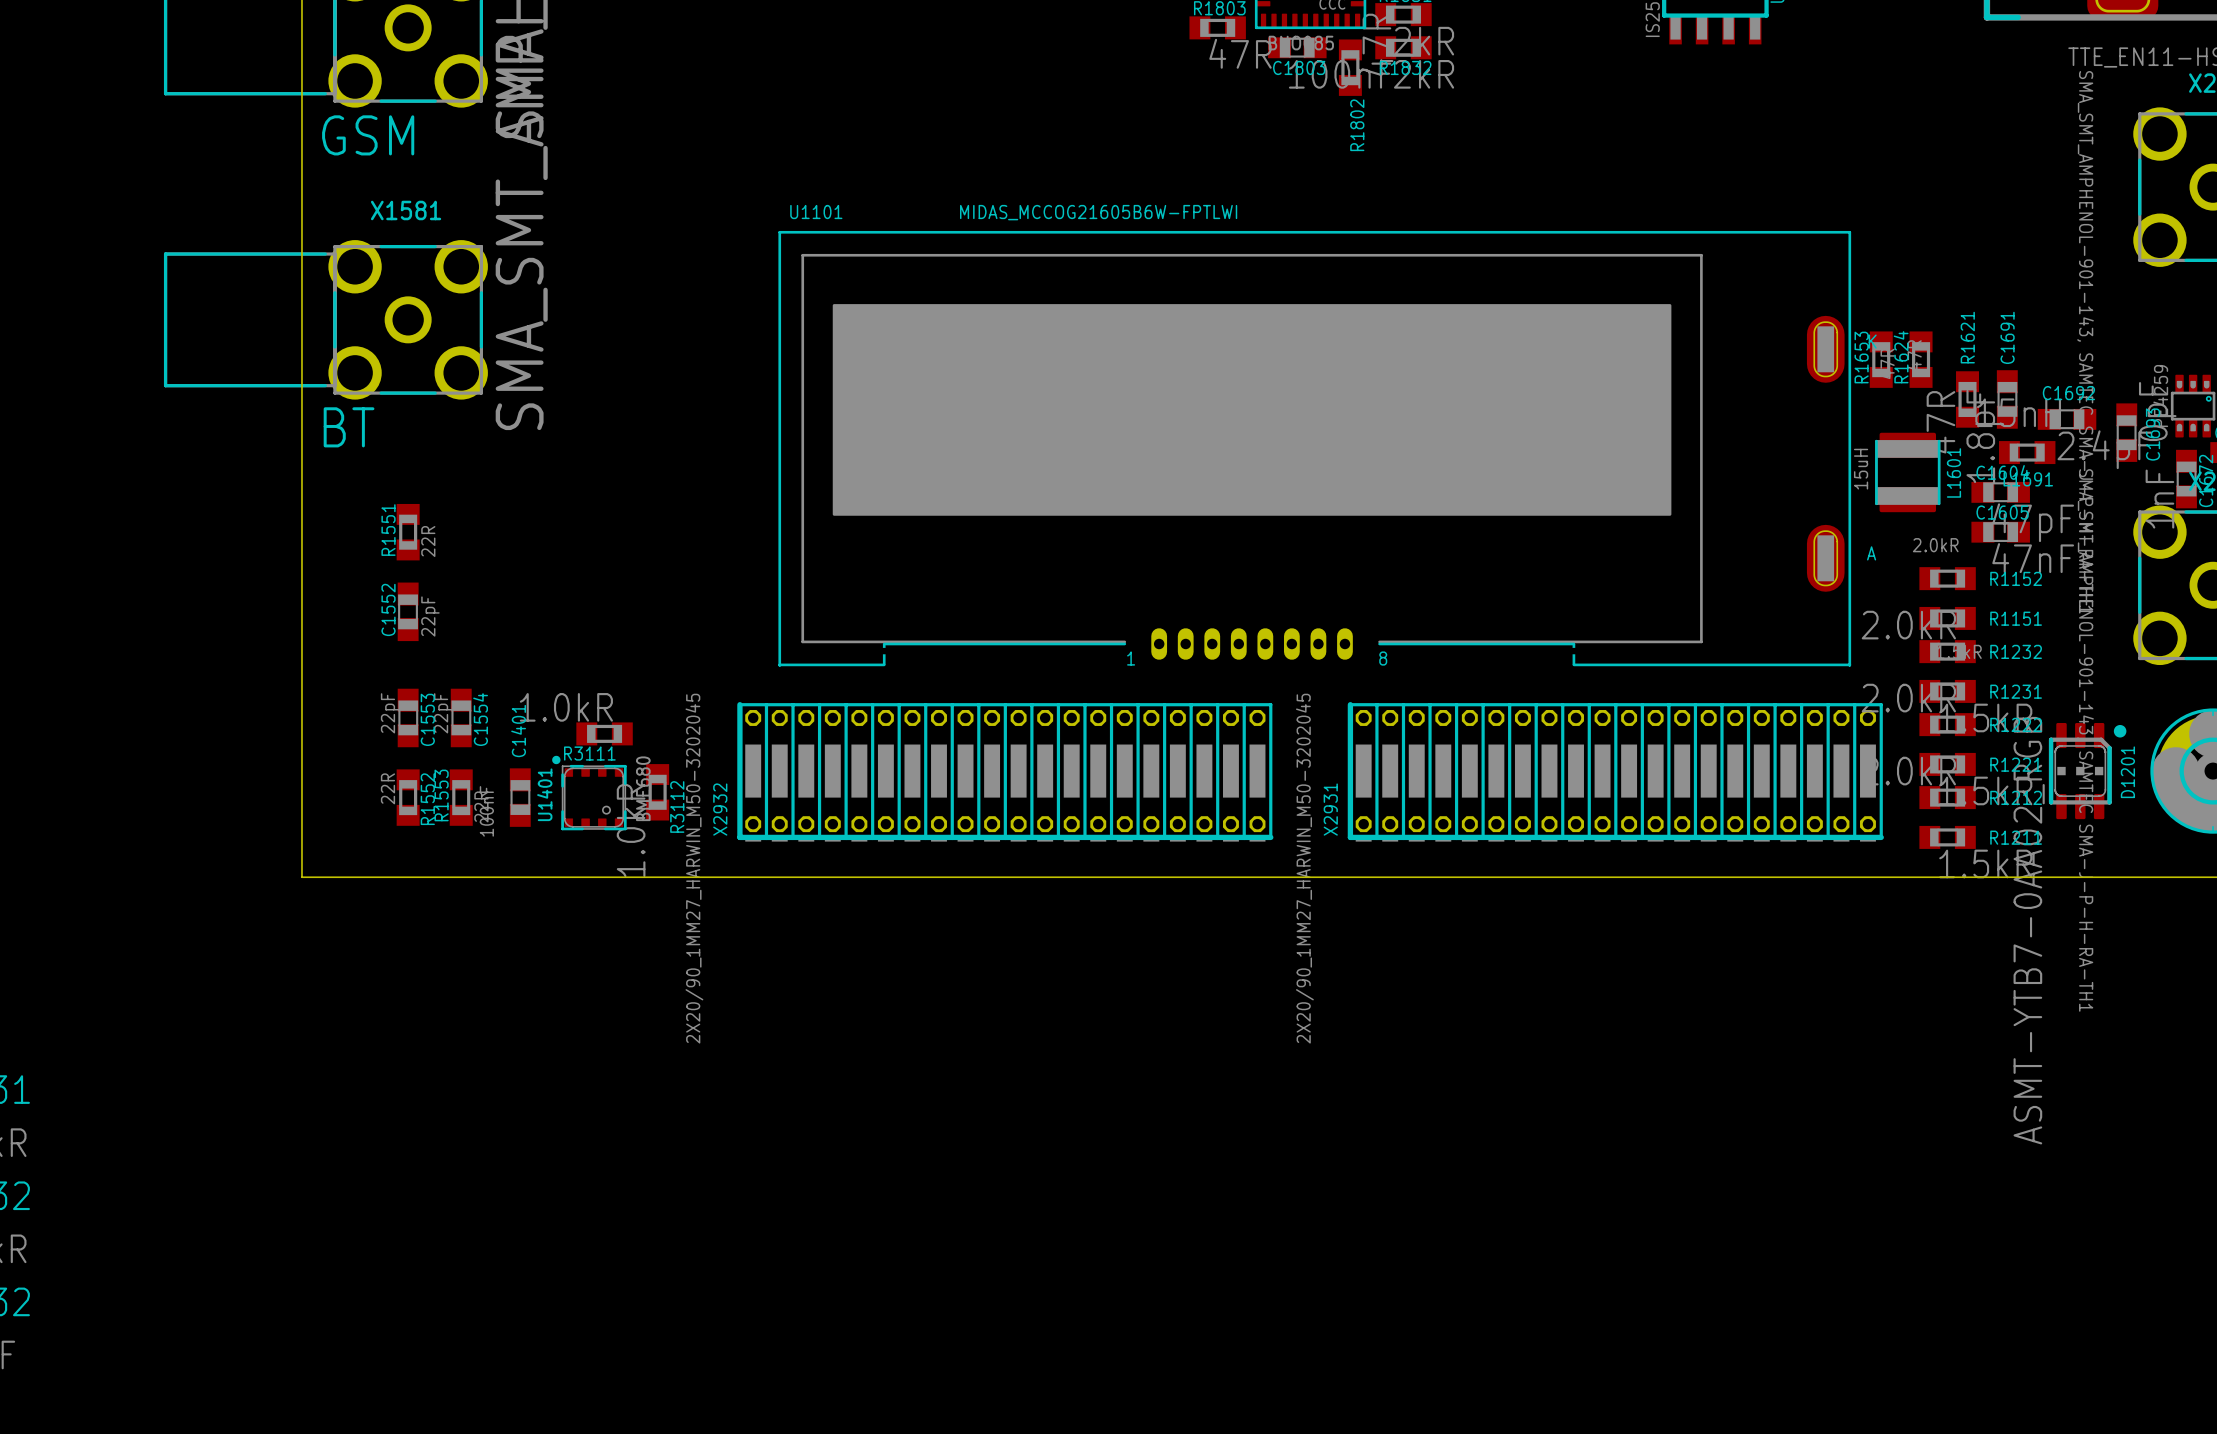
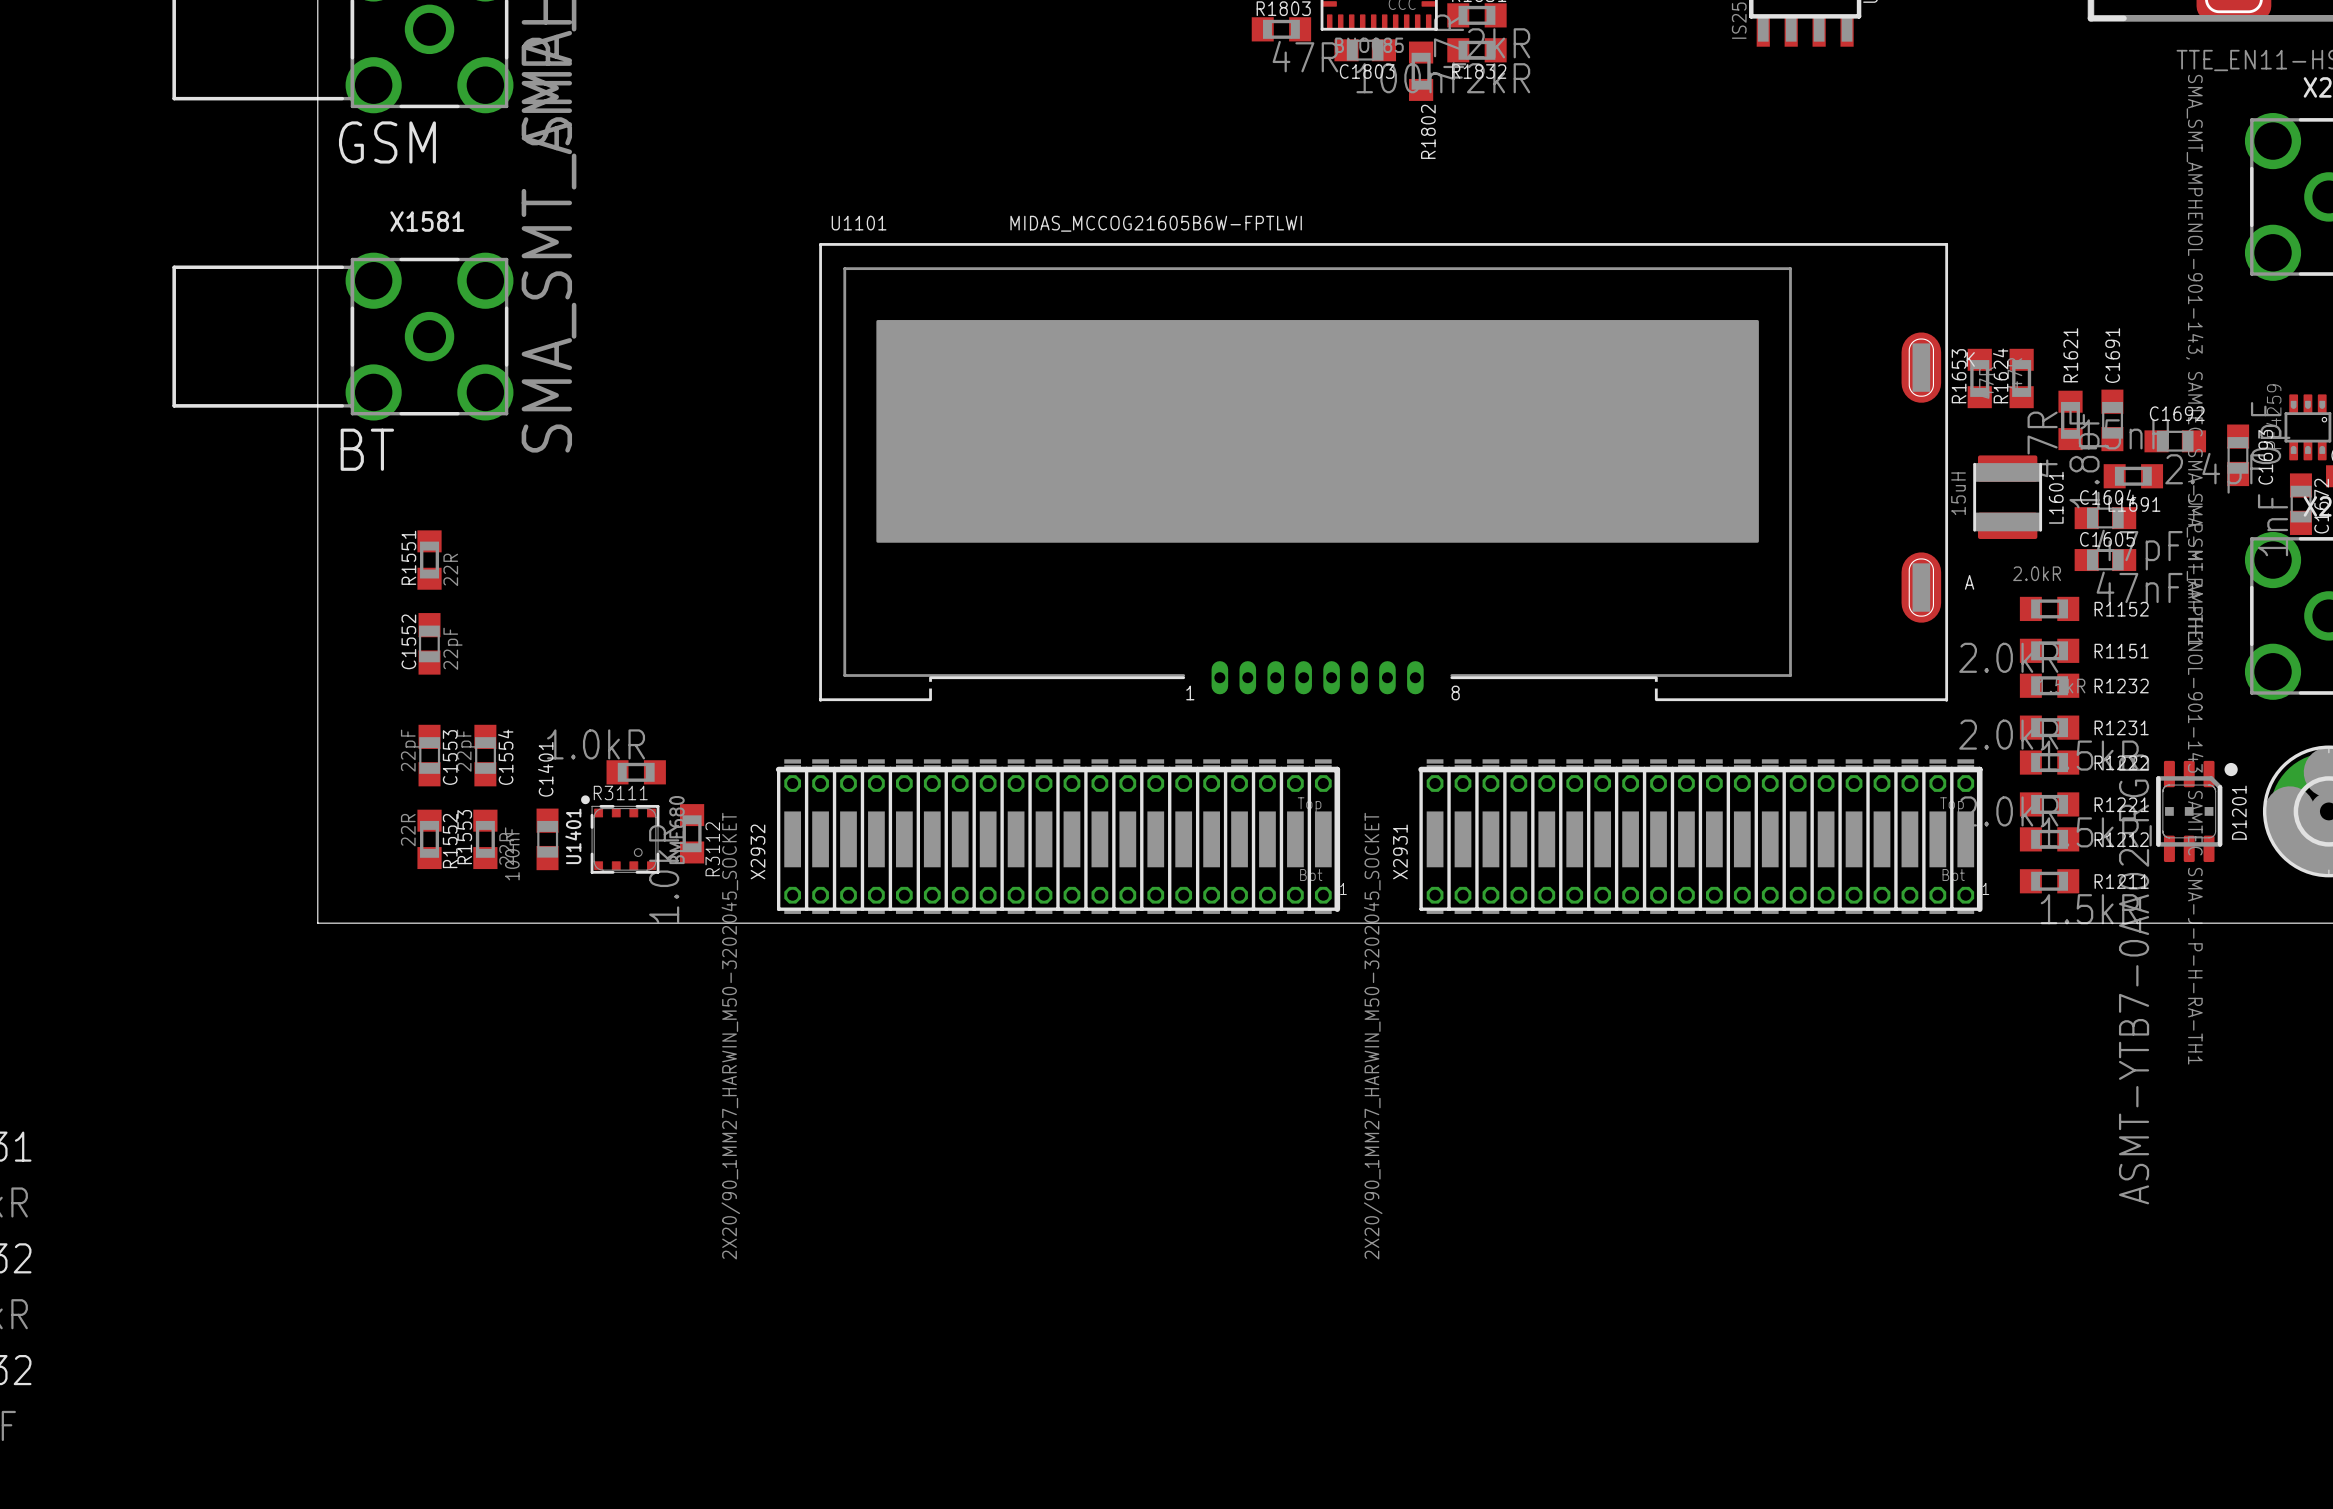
X2932 footprint: [737, 702, 1274, 842] -> [775, 759, 1341, 914]
X2931 footprint: [1347, 702, 1884, 842] -> [1418, 759, 1983, 914]
X2932 value: 2X20/90_1MM27_HARWIN_M50-3202045 (694, 868) -> 2X20/90_1MM27_HARWIN_M50-3202045_SOCKET (730, 1036)
X2931 value: 2X20/90_1MM27_HARWIN_M50-3202045 (1304, 868) -> 2X20/90_1MM27_HARWIN_M50-3202045_SOCKET (1373, 1036)

